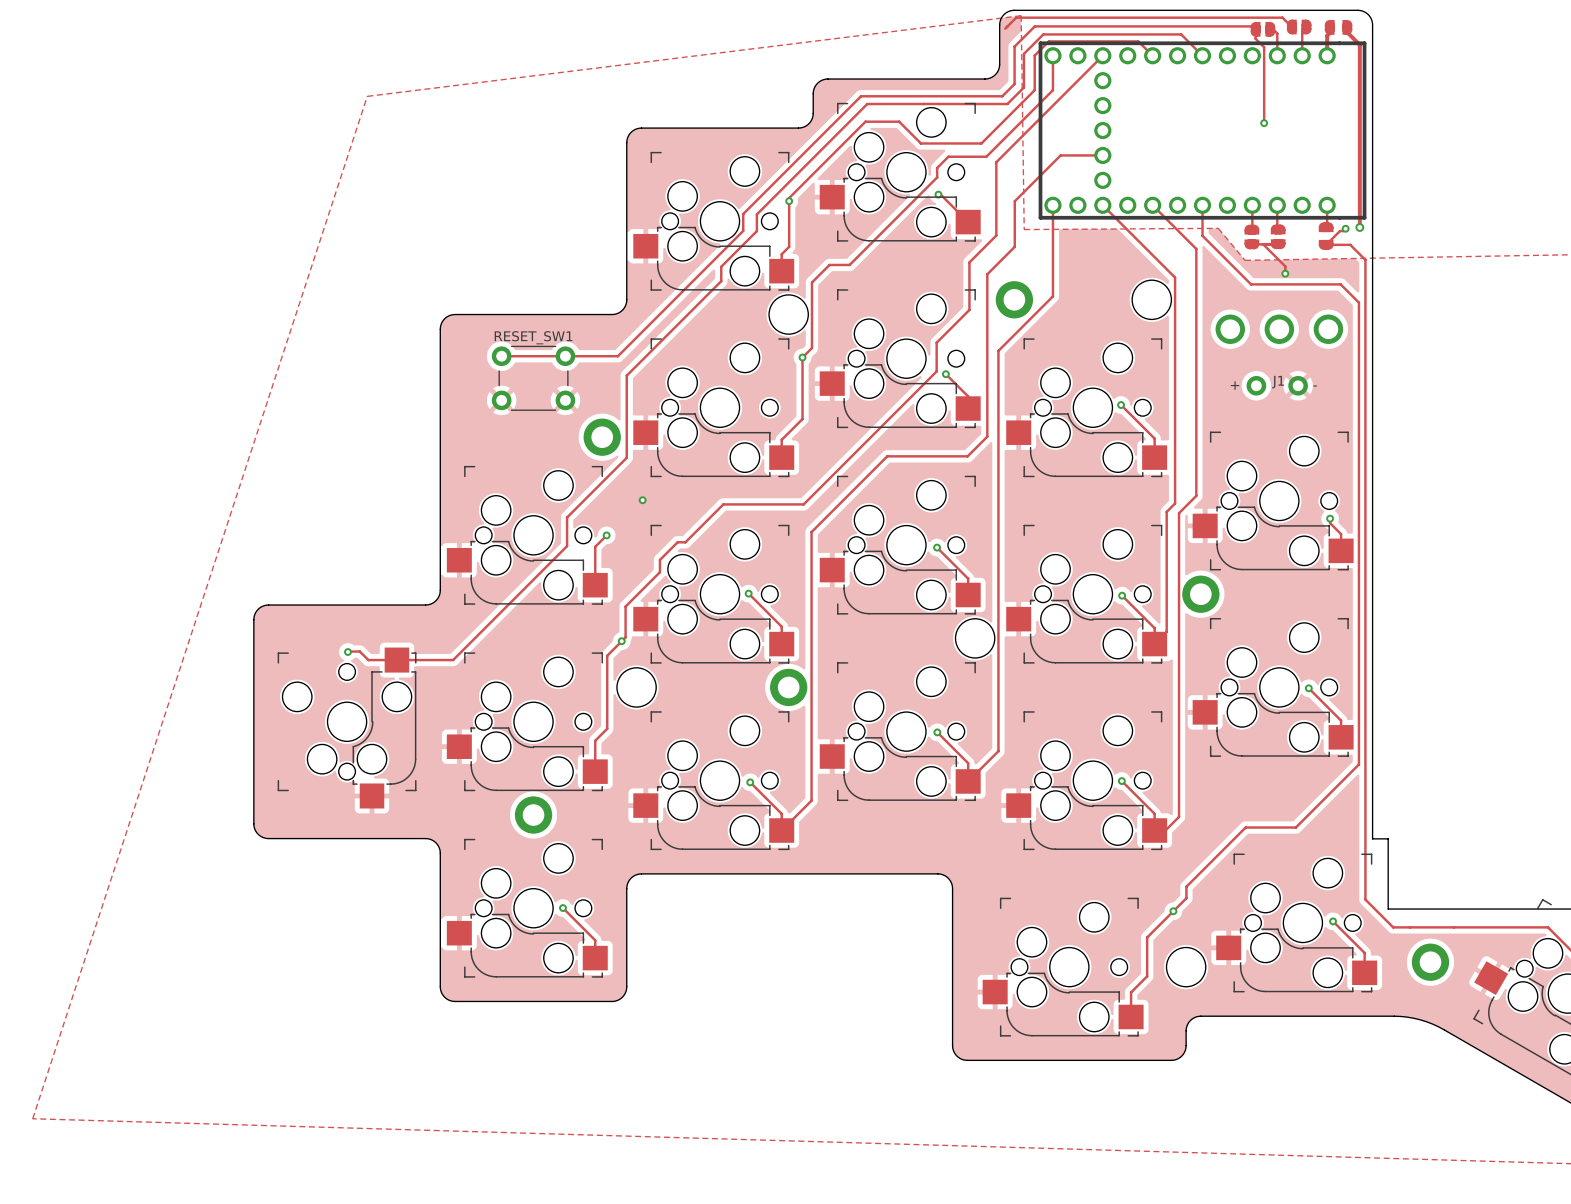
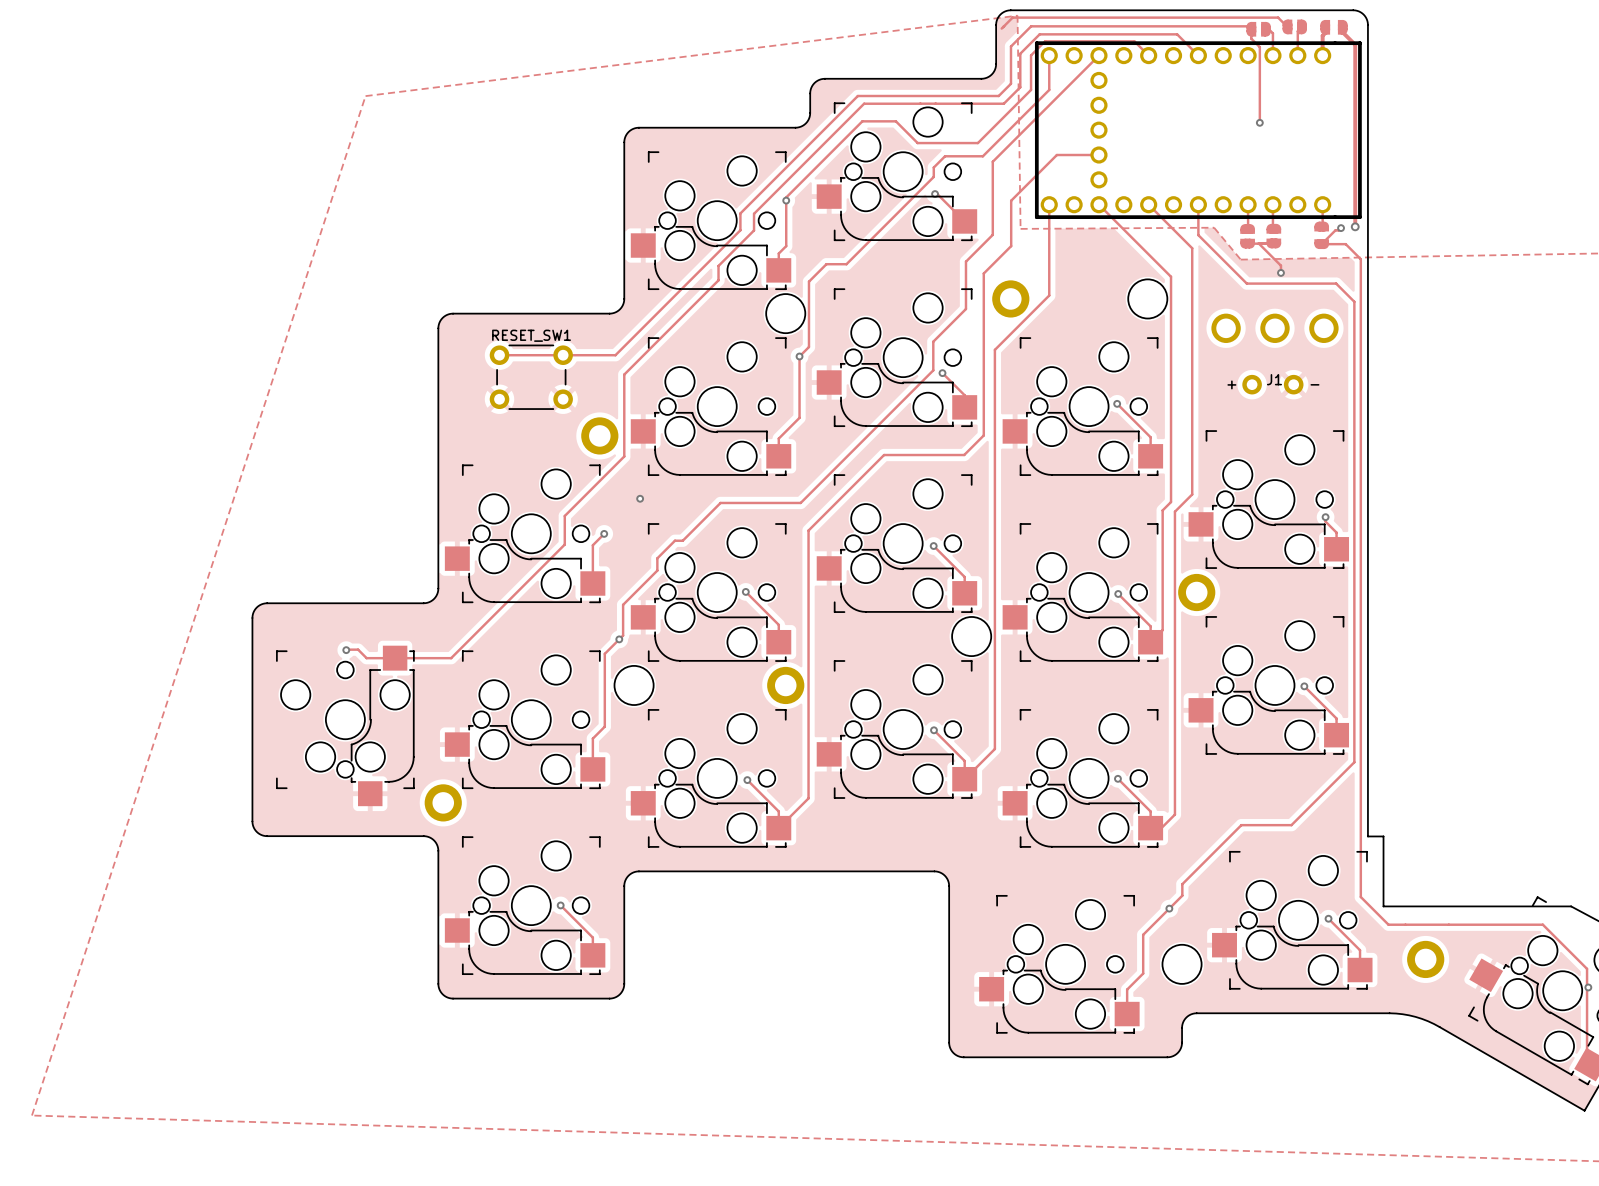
part position: (533, 815) -> (443, 802)

